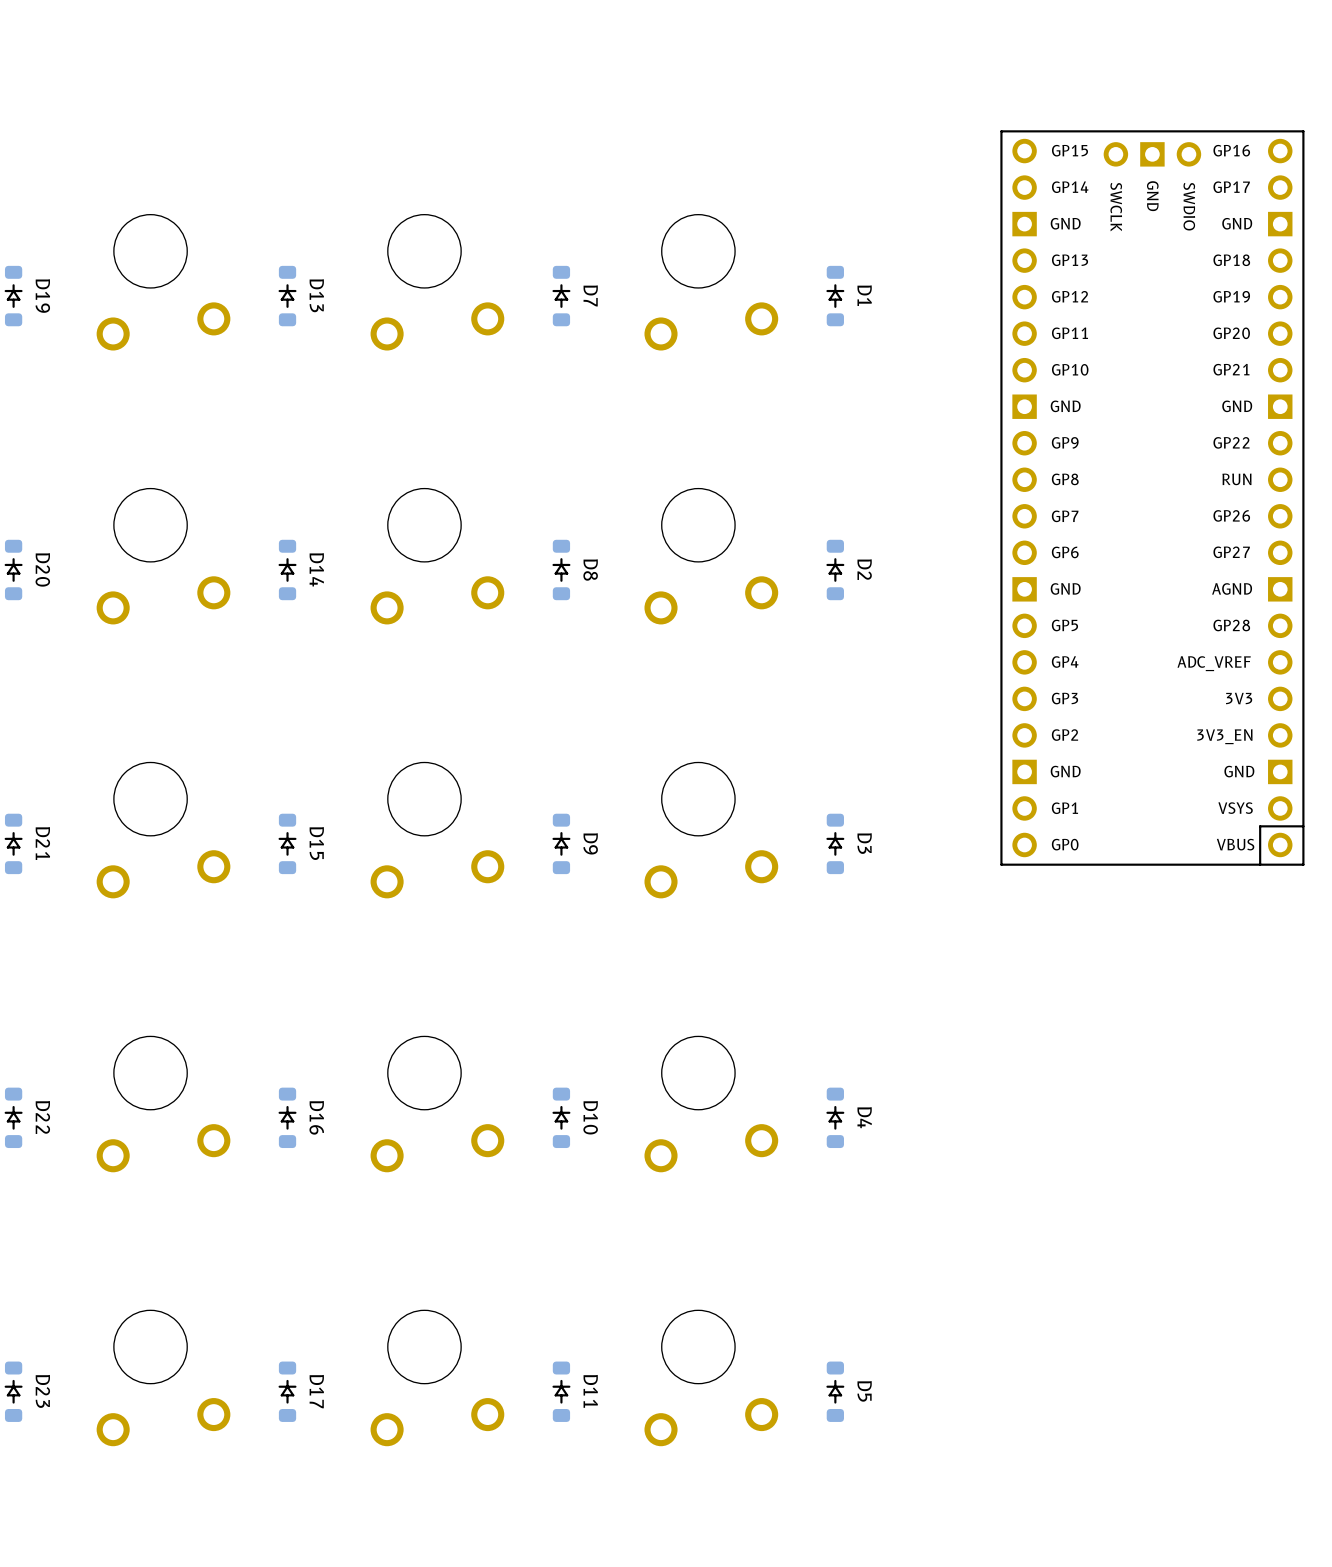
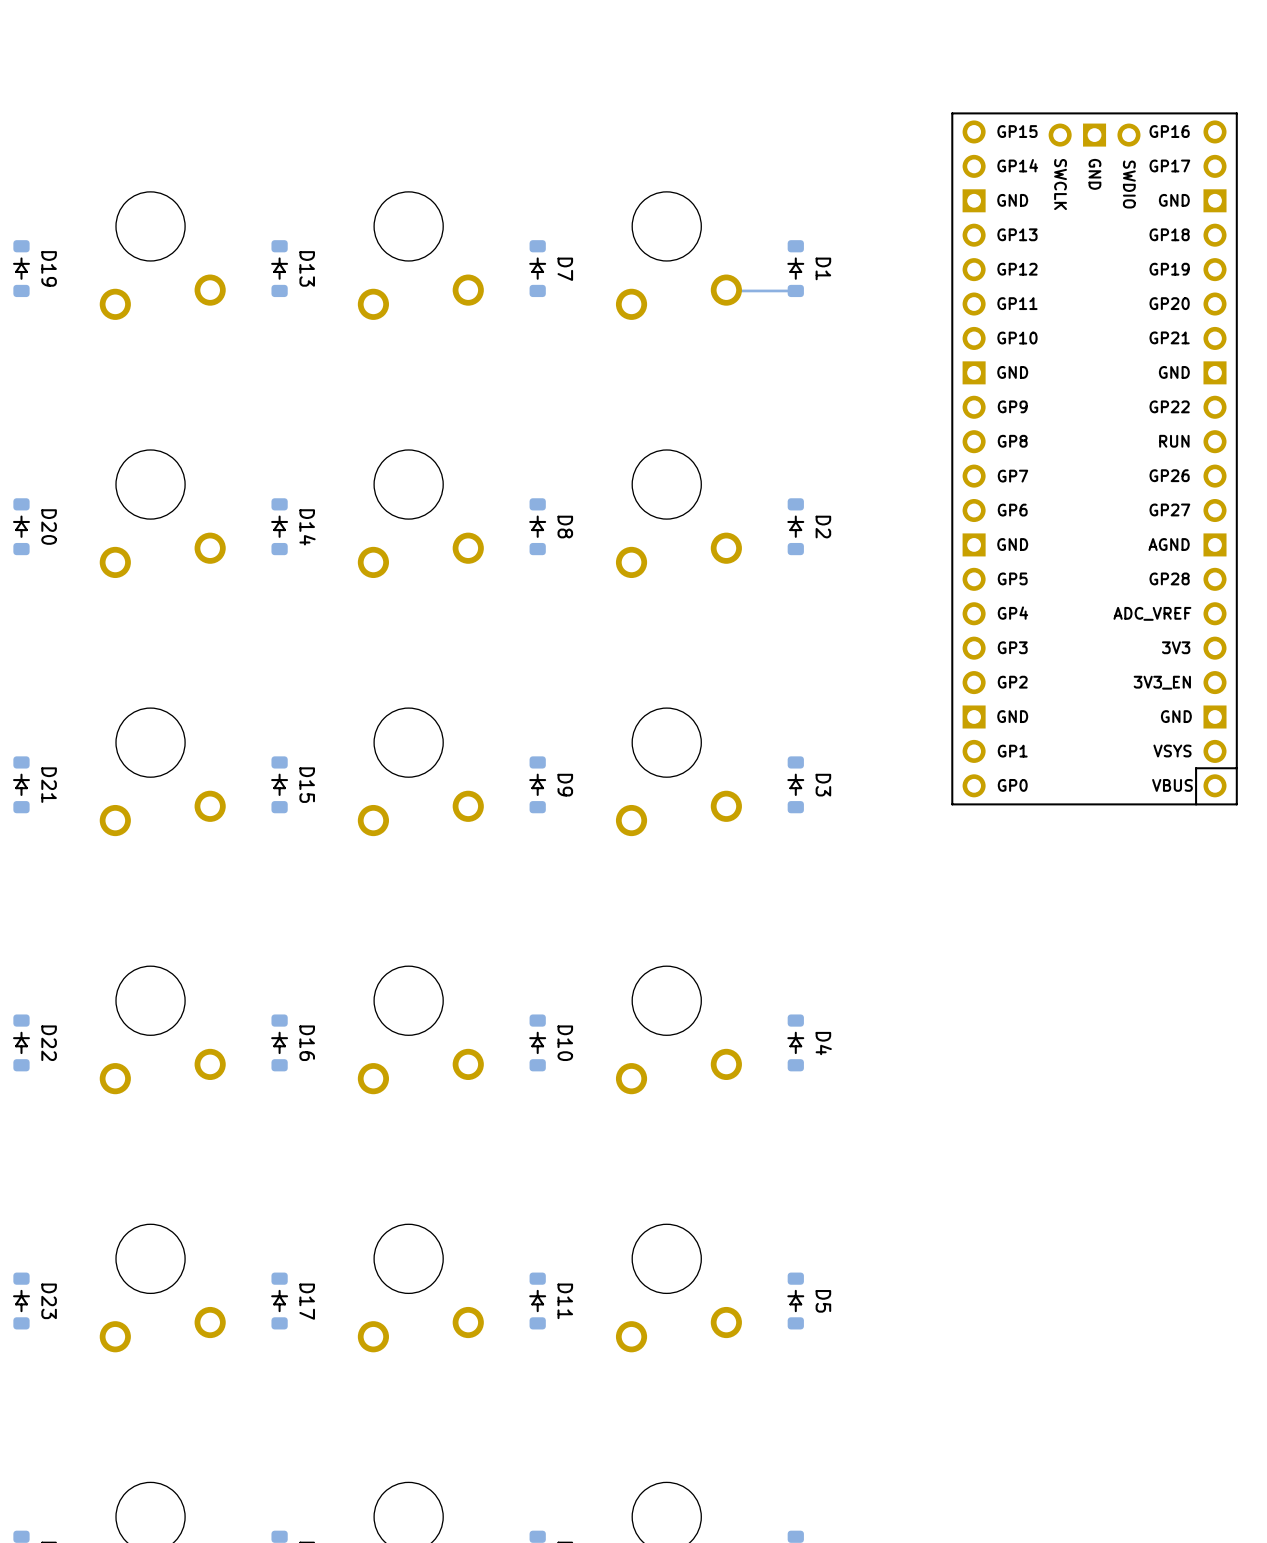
track: none -> (726, 290) (795, 290)

